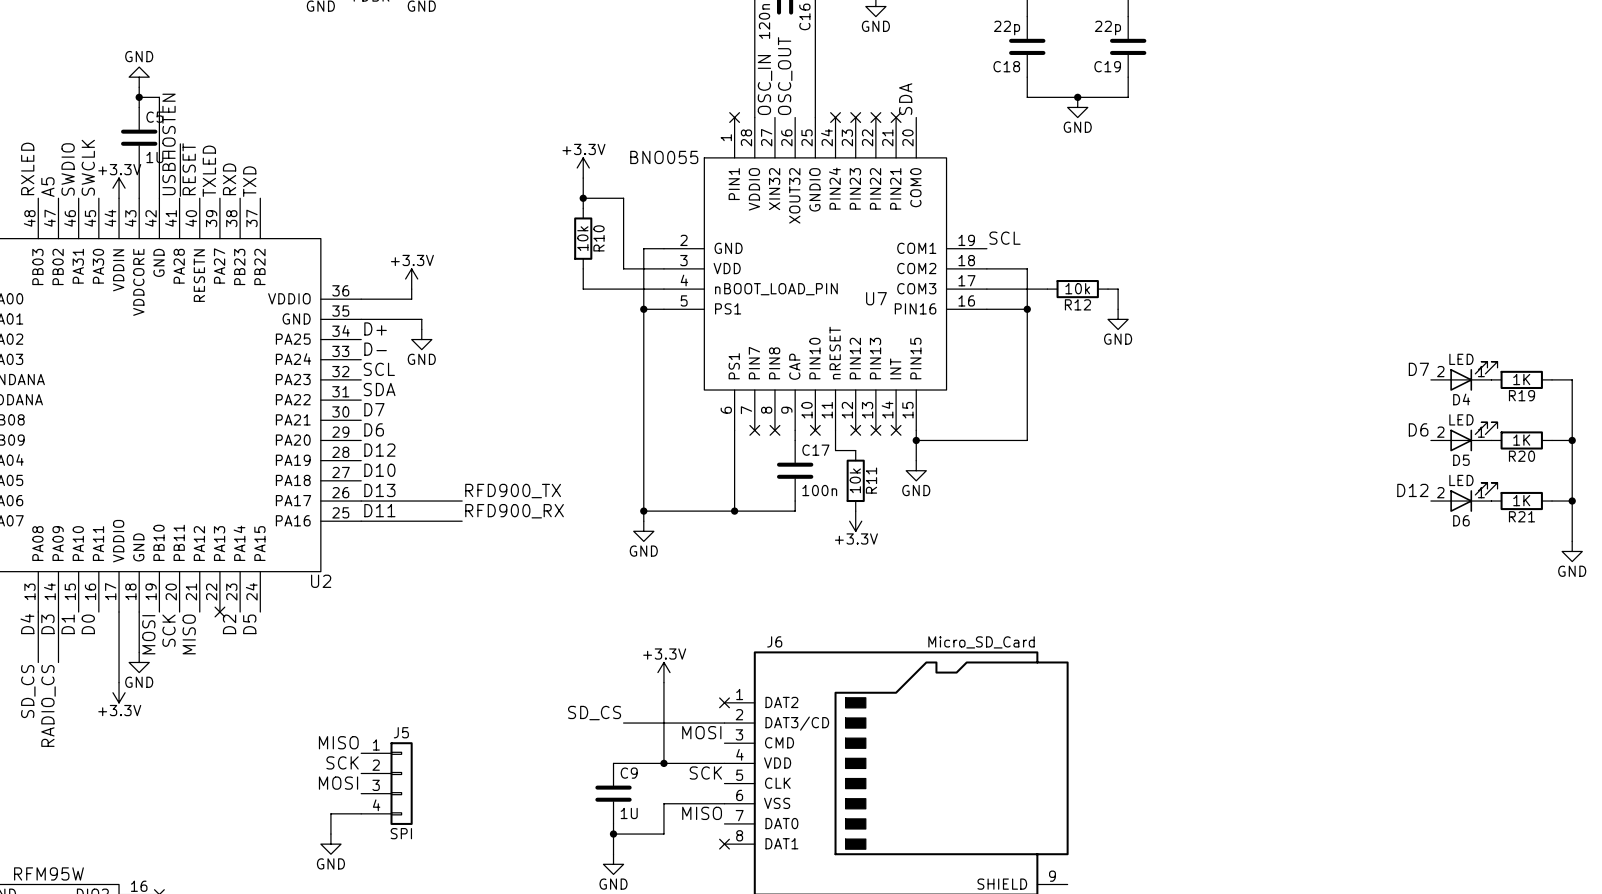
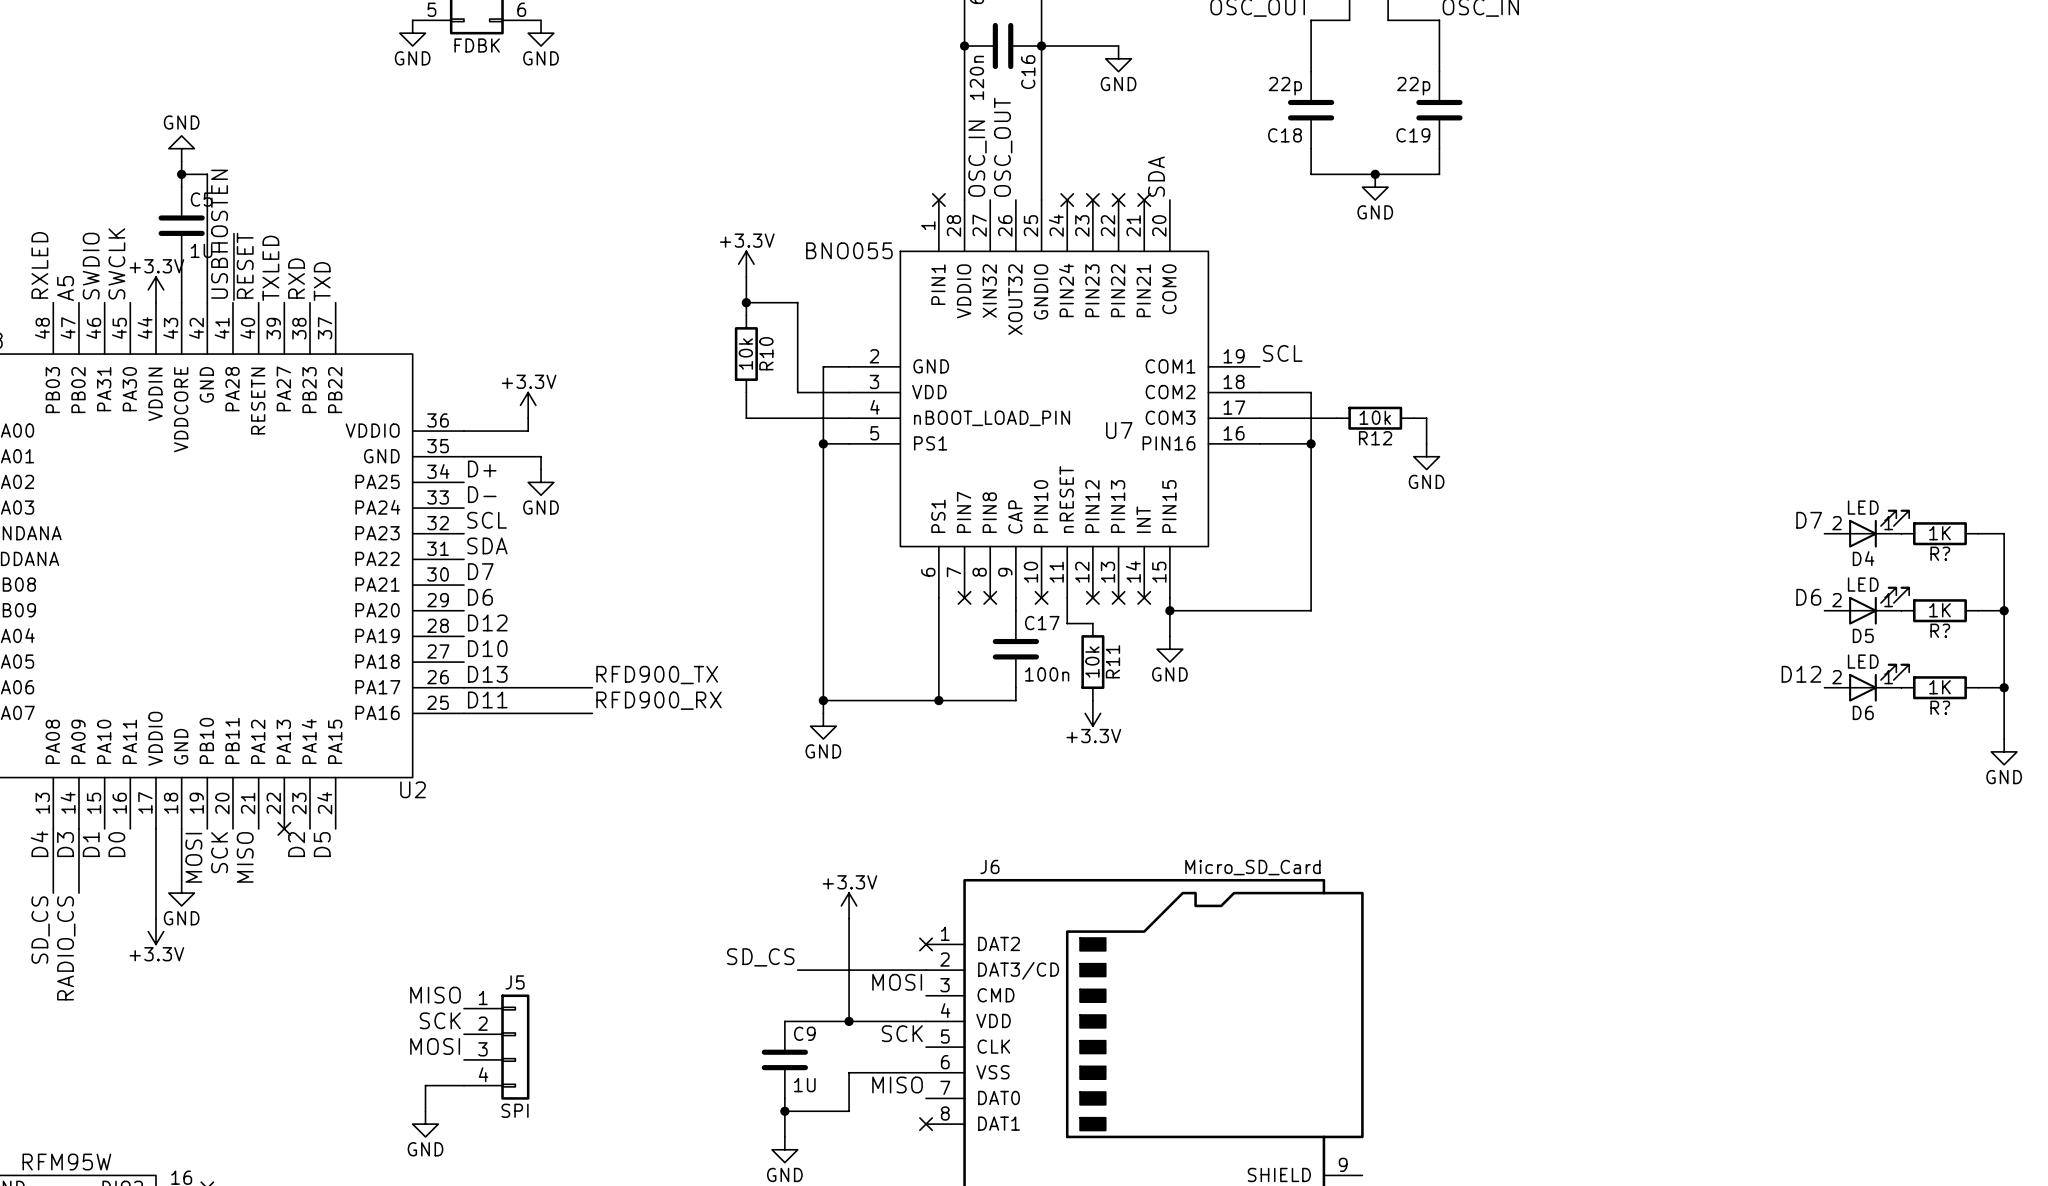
R19 name: R19 (1521, 395) -> R? (1940, 553)
R20 name: R20 (1521, 456) -> R? (1940, 630)
R21 name: R21 (1521, 516) -> R? (1940, 707)

